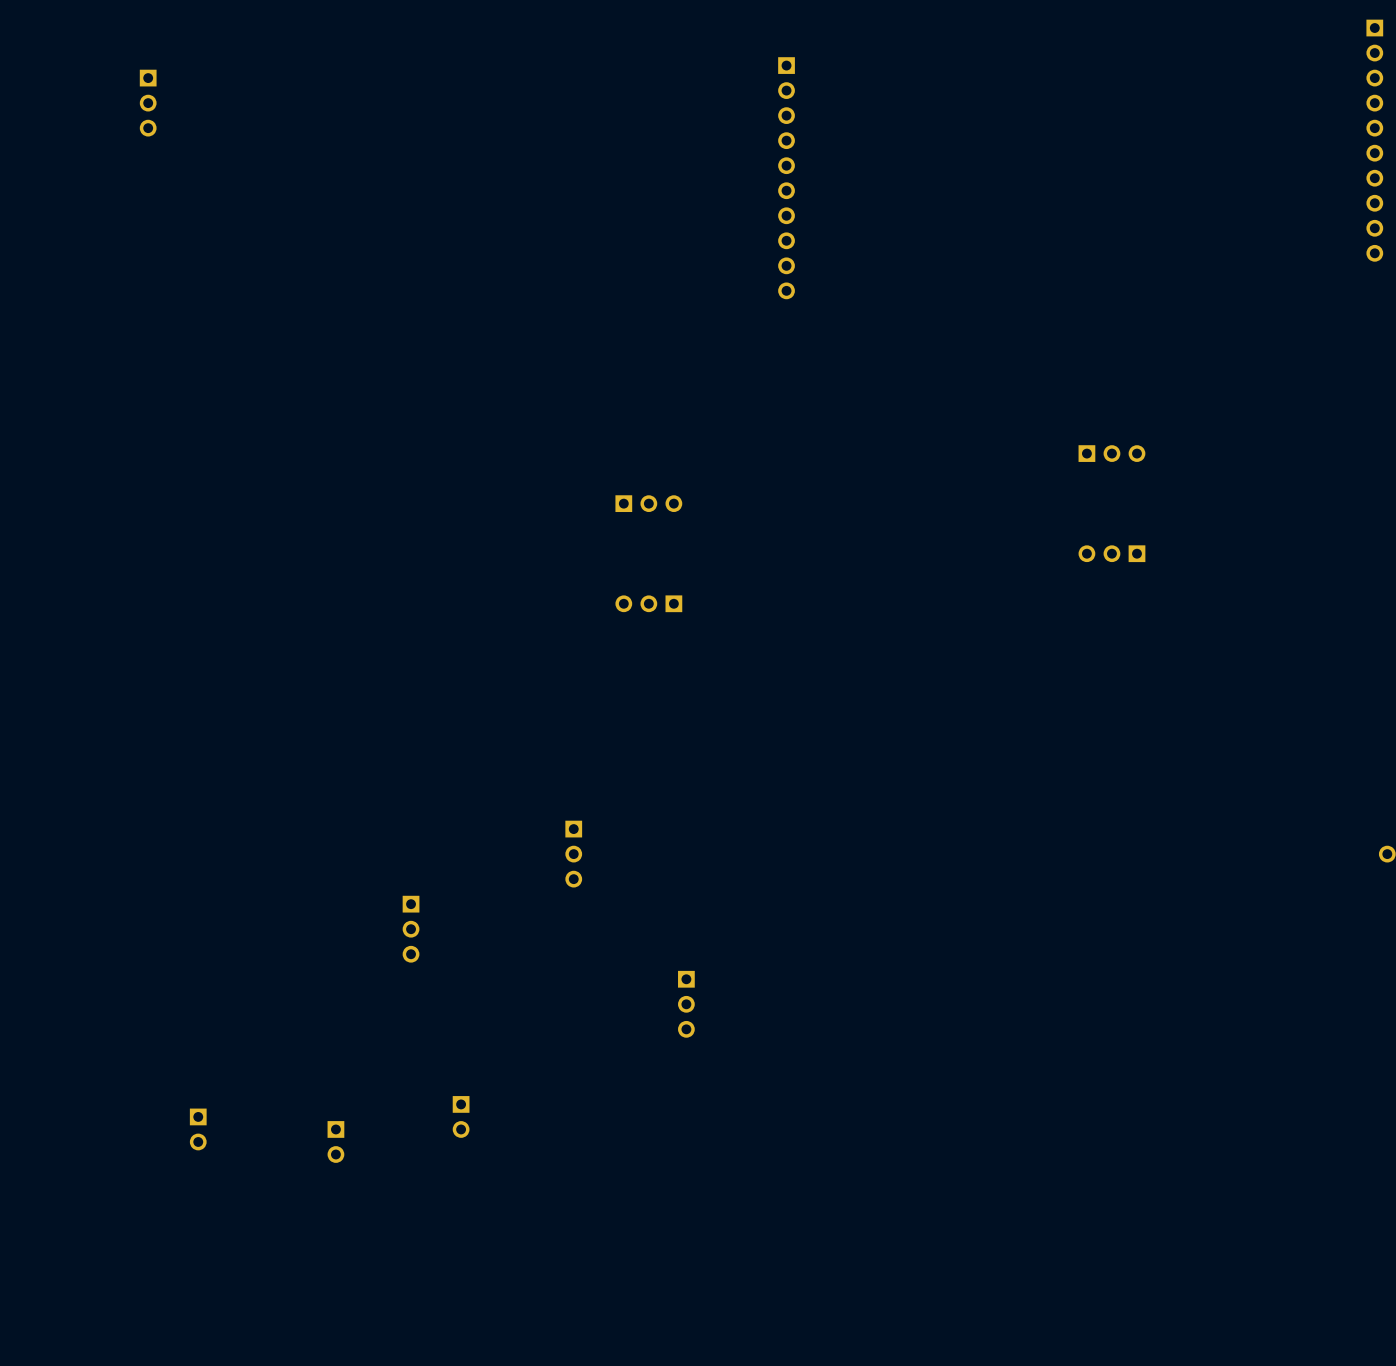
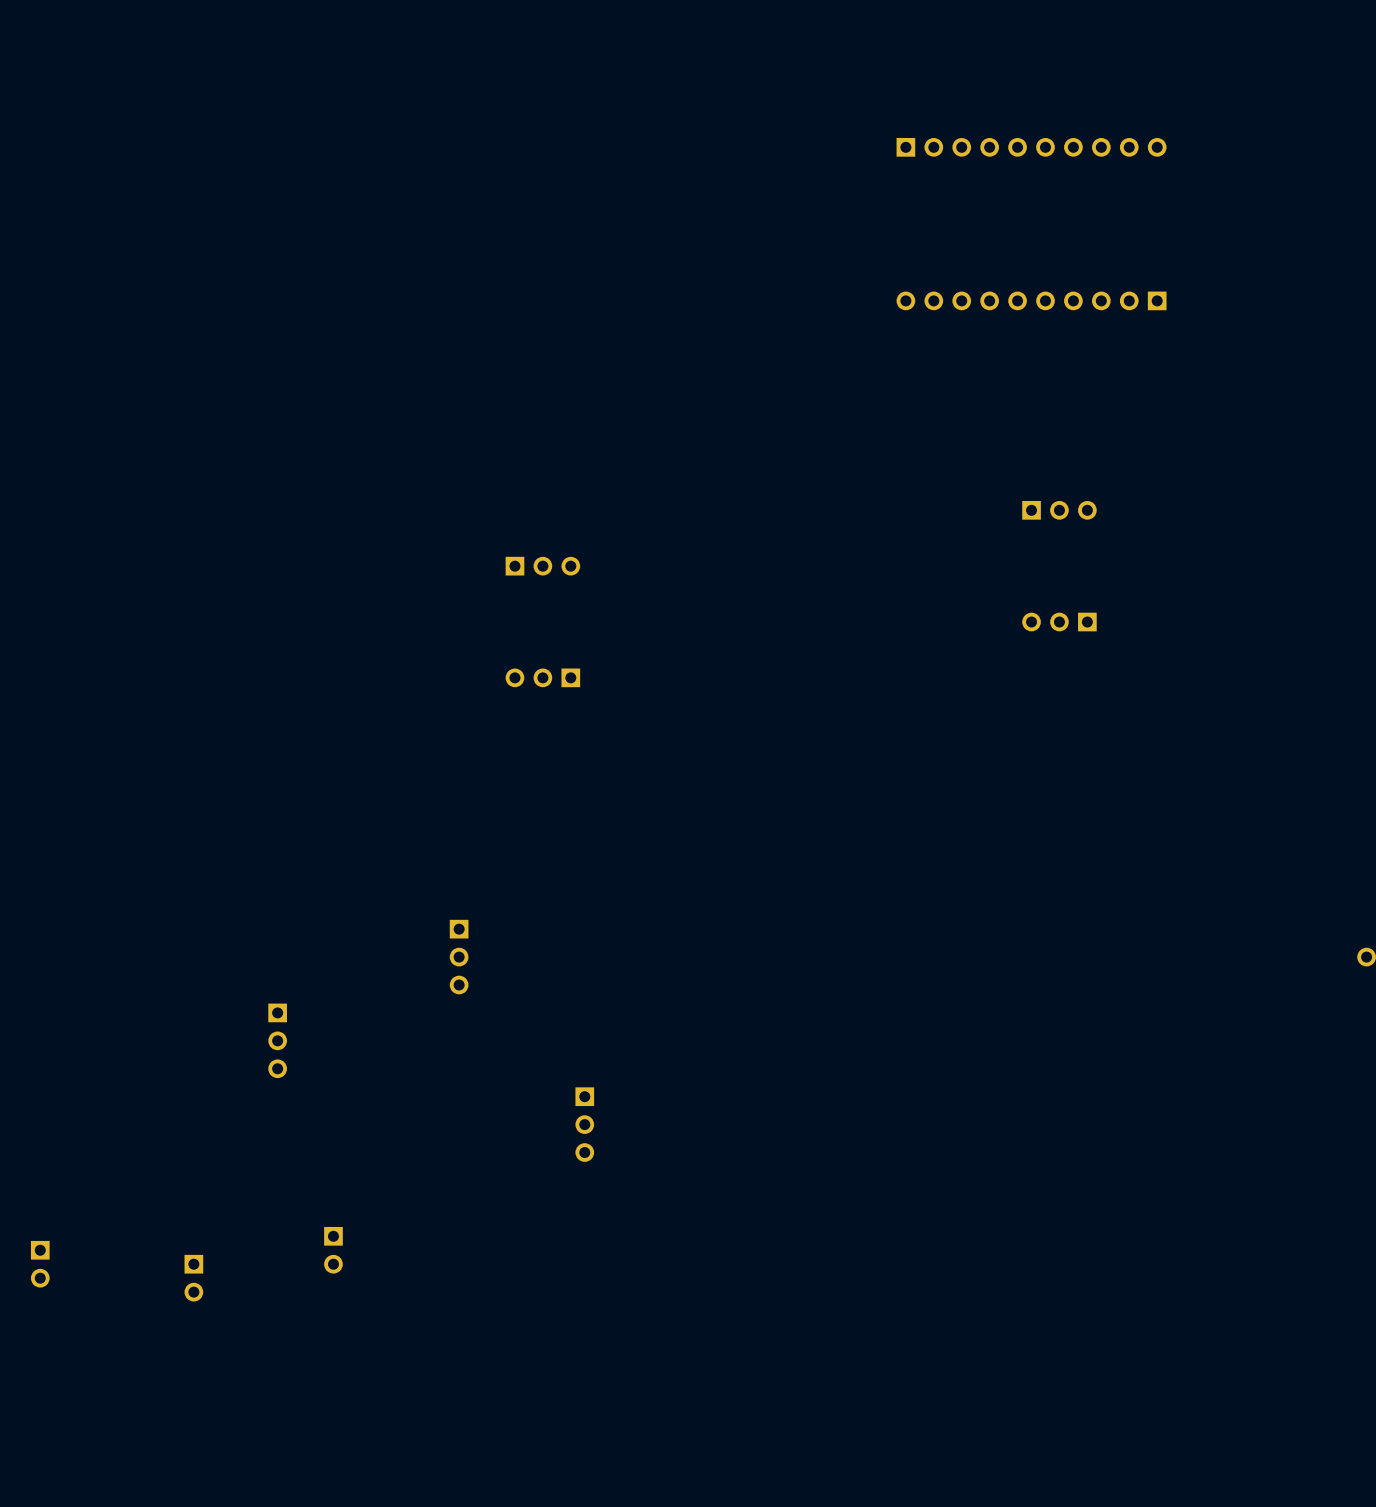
part: none -> (1031, 147)
part: (1374, 140) -> none
part: (786, 178) -> none
part: none -> (1031, 300)

